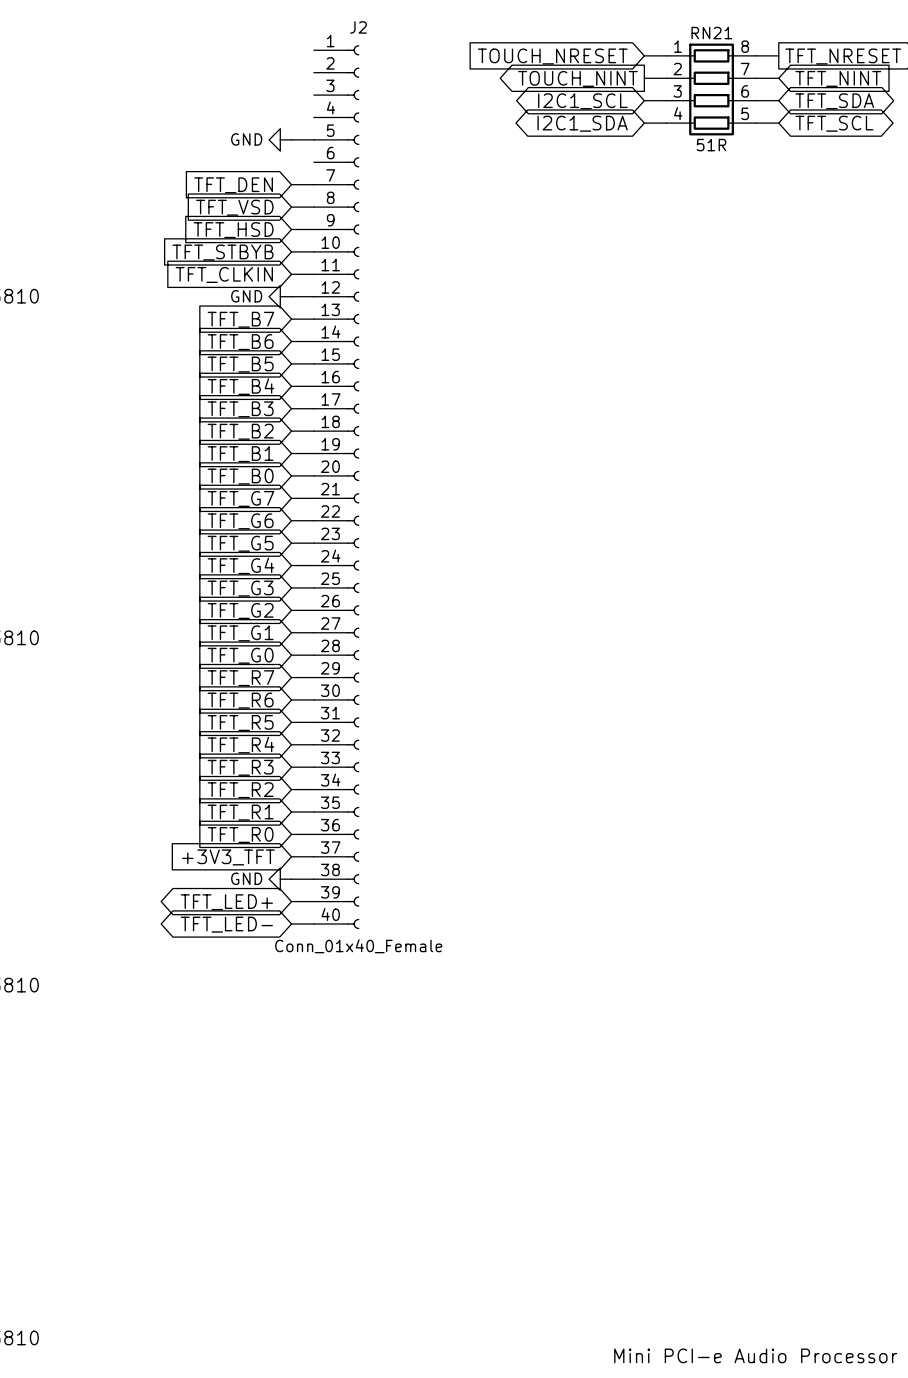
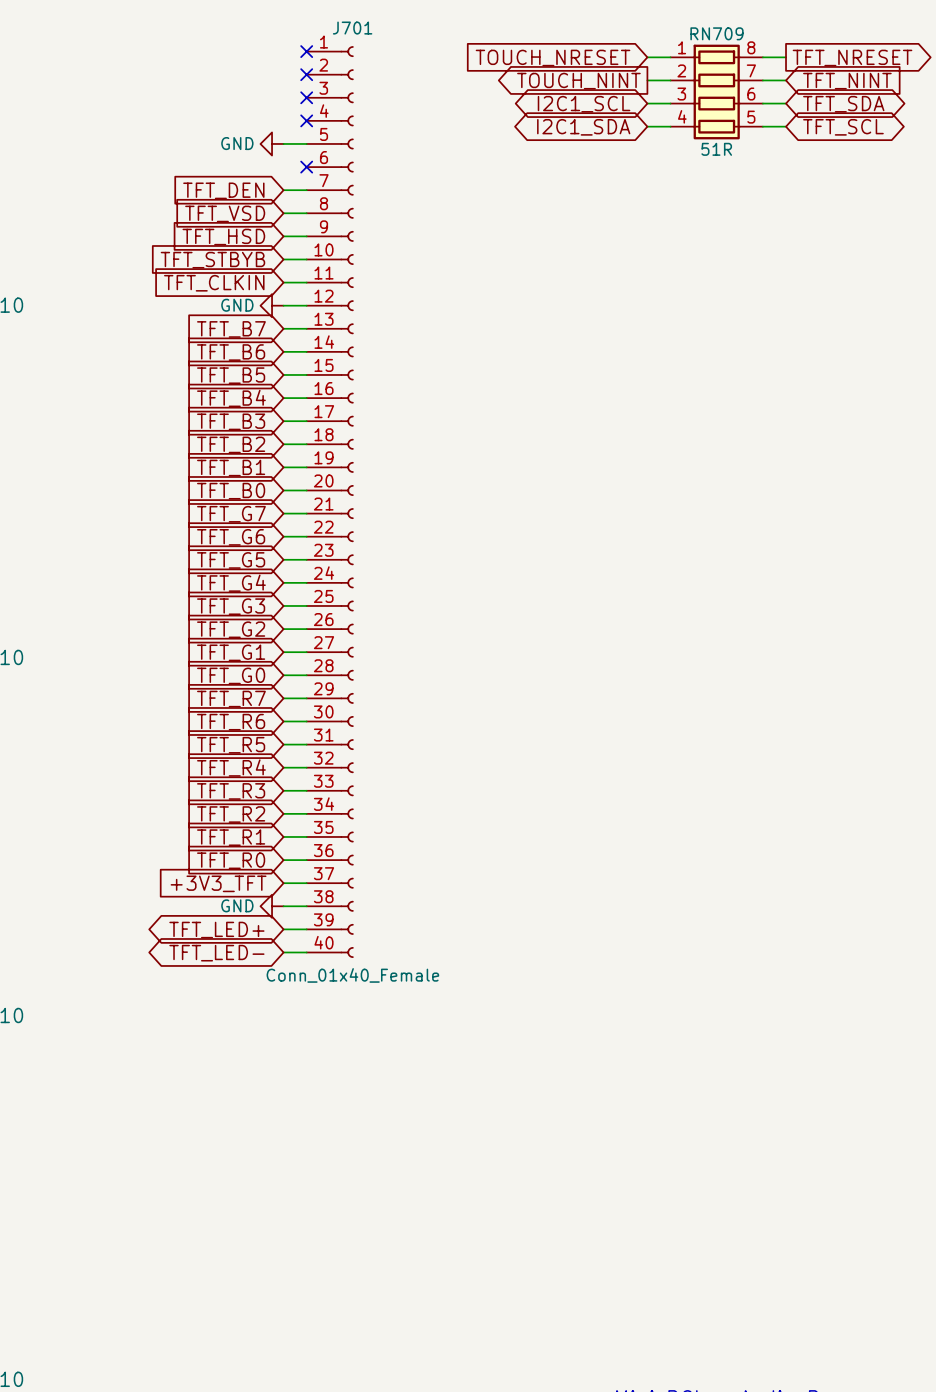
J2 name: J2 (358, 27) -> J701 (352, 28)
RN21 name: RN21 (711, 33) -> RN709 (716, 33)
no-connect mark: none -> (306, 51)
no-connect mark: none -> (306, 74)
no-connect mark: none -> (306, 97)
no-connect mark: none -> (306, 120)
no-connect mark: none -> (306, 167)

